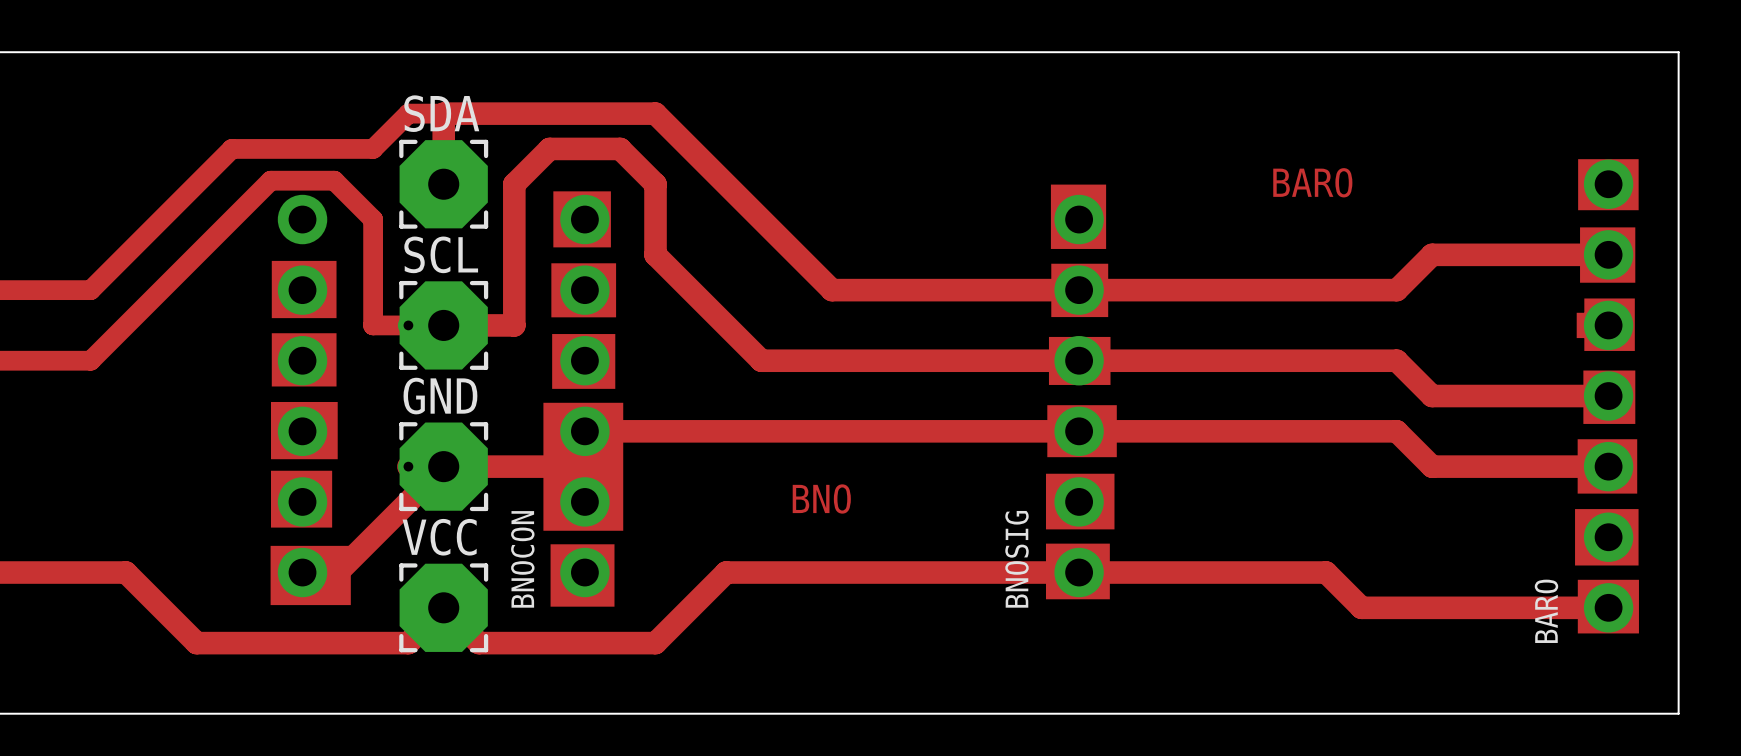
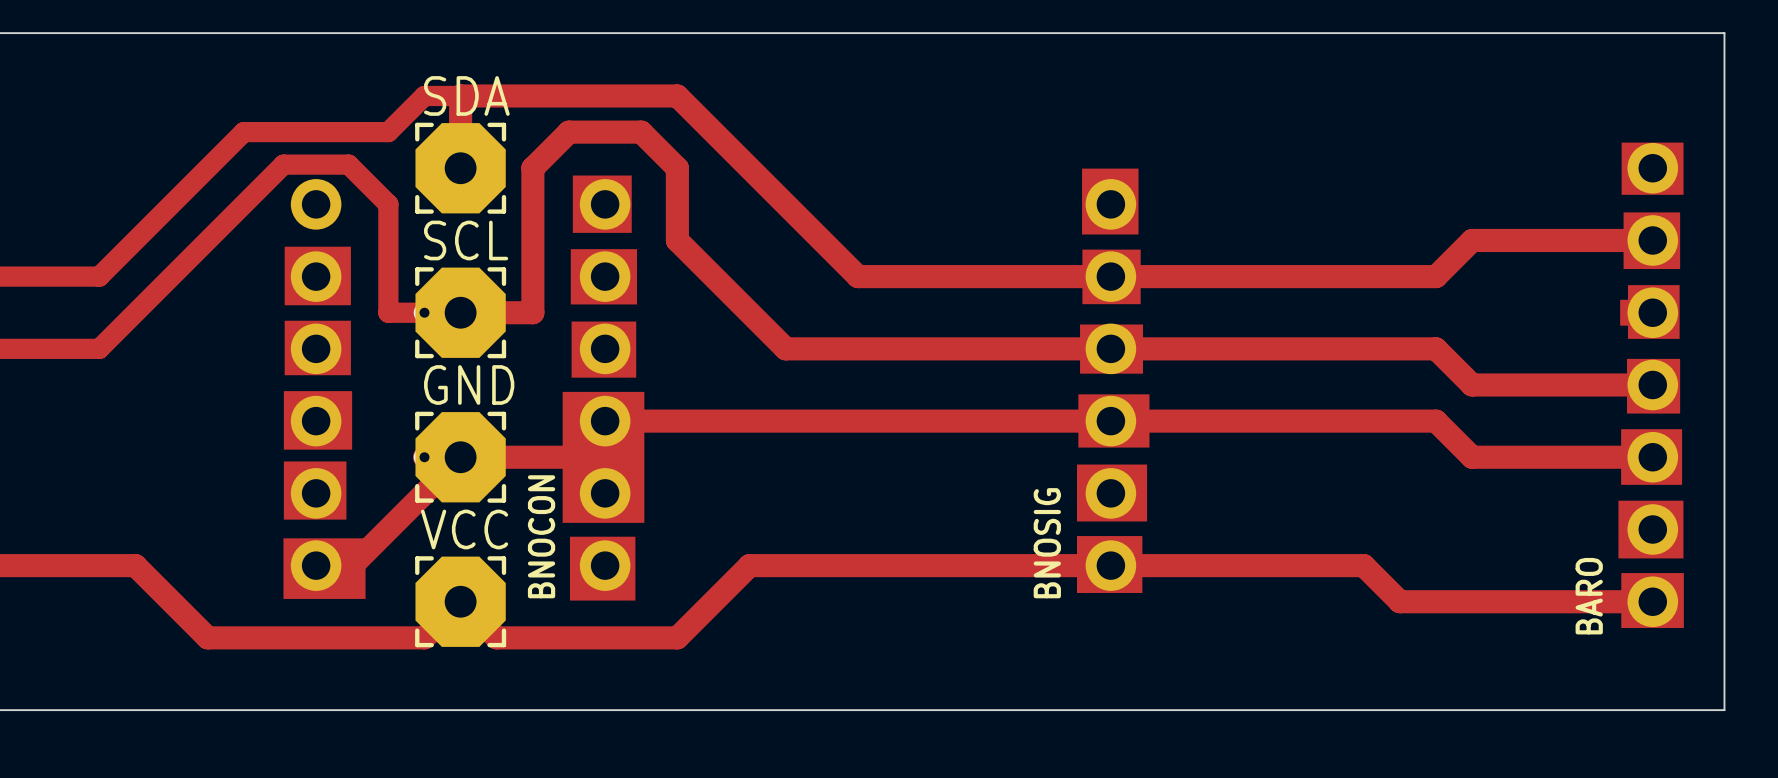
text: BARO (1312, 182) -> none
text: BNO (821, 498) -> none

